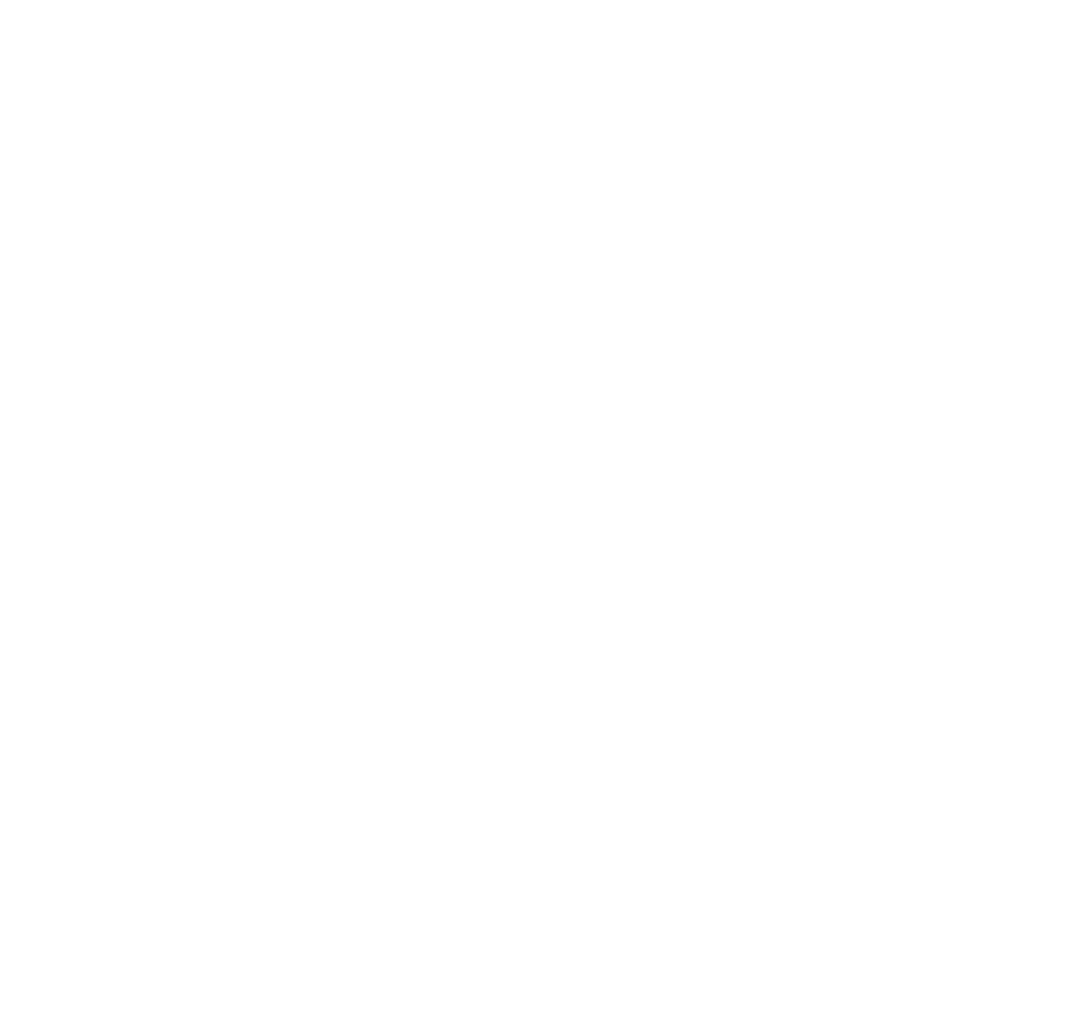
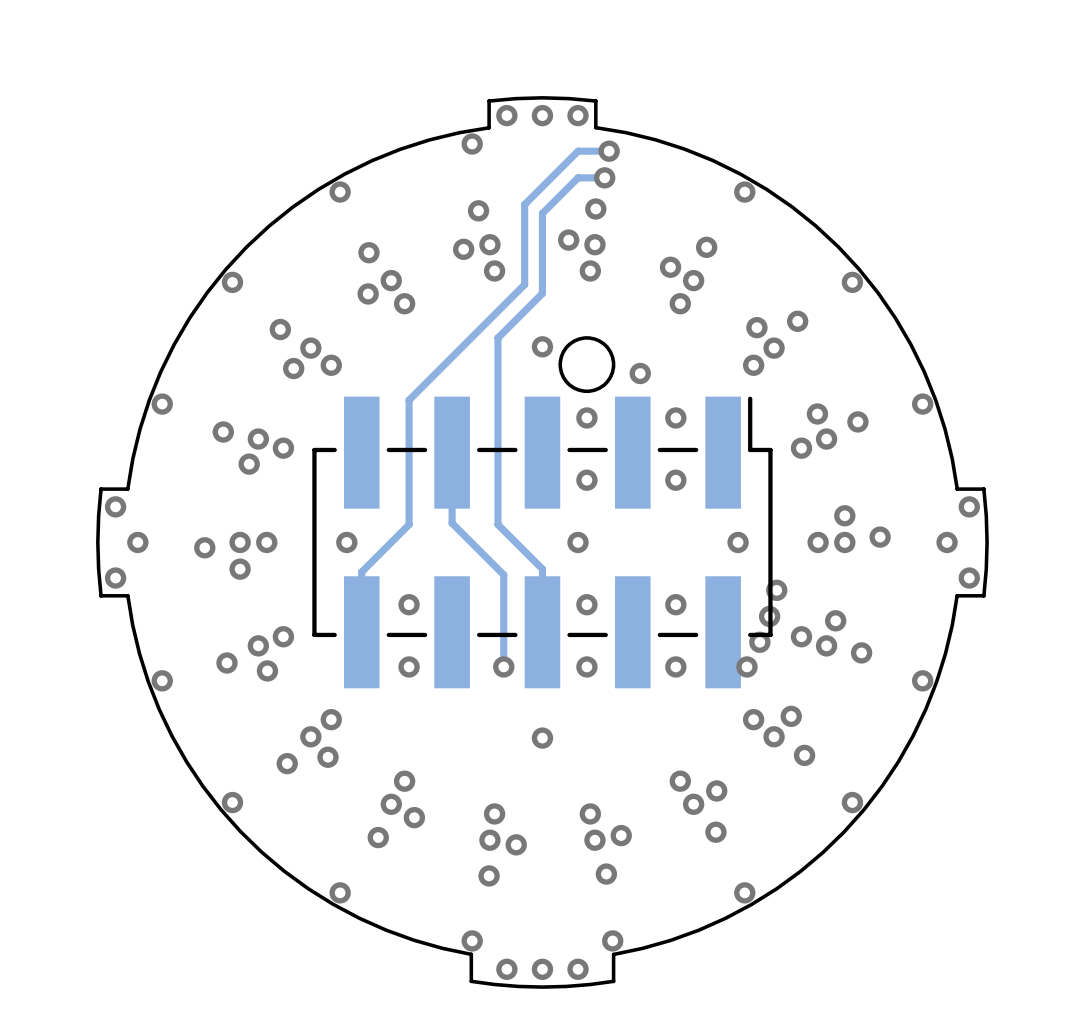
board edge: none -> (595, 101) (595, 127) (655, 139) (684, 149) (740, 174) (766, 189) (815, 225) (838, 246) (878, 292) (910, 344) (935, 400) (945, 429) (957, 489) (983, 489) (987, 542) (983, 595) (957, 595) (945, 653) (936, 681) (913, 735) (882, 786) (864, 809) (823, 852) (800, 871) (776, 888) (725, 918) (670, 940) (613, 954) (613, 981) (542, 987) (494, 984) (471, 981) (471, 954) (414, 940) (386, 930) (333, 904) (308, 888) (261, 852) (220, 809) (186, 761) (159, 709) (139, 653) (127, 595) (101, 595) (97, 542) (101, 489) (127, 489) (132, 458) (149, 400) (160, 371) (189, 318) (226, 269) (246, 246) (293, 206) (318, 189) (371, 160) (429, 139) (489, 127) (489, 101) (542, 97) (595, 101)
via: none -> (506, 115)
via: none -> (542, 115)
via: none -> (578, 115)
via: none -> (472, 143)
track: none -> (609, 151) (578, 151) (524, 204) (524, 284) (409, 400) (409, 524) (361, 571) (361, 632)
via: none -> (609, 151)
track: none -> (604, 177) (578, 177) (542, 213) (542, 293) (497, 337) (497, 524) (542, 569) (542, 632)
via: none -> (604, 177)
via: none -> (340, 192)
via: none -> (744, 192)
via: none -> (595, 208)
via: none -> (478, 210)
via: none -> (568, 240)
via: none -> (489, 244)
via: none -> (594, 244)
via: none -> (706, 247)
via: none -> (463, 249)
via: none -> (368, 252)
via: none -> (670, 267)
via: none -> (494, 270)
via: none -> (590, 270)
via: none -> (391, 280)
via: none -> (693, 280)
via: none -> (232, 282)
via: none -> (852, 282)
via: none -> (368, 293)
via: none -> (404, 303)
via: none -> (680, 303)
via: none -> (797, 321)
via: none -> (756, 327)
via: none -> (280, 329)
round board edge: none -> [558, 336, 616, 394]
via: none -> (542, 346)
via: none -> (310, 348)
via: none -> (774, 348)
via: none -> (331, 365)
via: none -> (753, 365)
via: none -> (293, 368)
via: none -> (640, 373)
via: none -> (162, 404)
via: none -> (922, 404)
via: none -> (817, 413)
via: none -> (586, 417)
via: none -> (675, 417)
via: none -> (857, 421)
via: none -> (223, 432)
via: none -> (258, 439)
via: none -> (826, 439)
via: none -> (283, 448)
via: none -> (801, 448)
track: none -> (452, 452) (452, 523) (503, 574) (503, 666)
via: none -> (249, 464)
via: none -> (586, 480)
via: none -> (675, 480)
via: none -> (115, 506)
via: none -> (969, 506)
via: none -> (844, 515)
via: none -> (880, 537)
via: none -> (137, 542)
via: none -> (240, 542)
via: none -> (266, 542)
via: none -> (346, 542)
part: none -> (542, 542)
via: none -> (578, 542)
via: none -> (738, 542)
via: none -> (818, 542)
via: none -> (844, 542)
via: none -> (947, 542)
via: none -> (204, 547)
via: none -> (240, 569)
via: none -> (115, 578)
via: none -> (969, 578)
via: none -> (776, 590)
via: none -> (409, 604)
via: none -> (586, 604)
via: none -> (675, 604)
via: none -> (769, 616)
via: none -> (835, 620)
via: none -> (283, 636)
via: none -> (801, 636)
via: none -> (759, 642)
via: none -> (258, 645)
via: none -> (826, 645)
via: none -> (861, 652)
via: none -> (226, 662)
via: none -> (409, 666)
via: none -> (503, 666)
via: none -> (586, 666)
via: none -> (675, 666)
via: none -> (746, 666)
via: none -> (267, 670)
via: none -> (162, 680)
via: none -> (922, 680)
via: none -> (791, 716)
via: none -> (331, 719)
via: none -> (753, 719)
via: none -> (310, 736)
via: none -> (774, 736)
via: none -> (542, 738)
via: none -> (804, 755)
via: none -> (327, 757)
via: none -> (287, 763)
via: none -> (404, 781)
via: none -> (680, 781)
via: none -> (716, 790)
via: none -> (232, 802)
via: none -> (852, 802)
via: none -> (391, 804)
via: none -> (693, 804)
via: none -> (494, 813)
via: none -> (590, 813)
via: none -> (414, 817)
via: none -> (715, 832)
via: none -> (621, 835)
via: none -> (378, 837)
via: none -> (489, 840)
via: none -> (594, 840)
via: none -> (516, 844)
via: none -> (606, 874)
via: none -> (489, 875)
via: none -> (340, 892)
via: none -> (744, 892)
via: none -> (472, 940)
via: none -> (612, 940)
via: none -> (506, 969)
via: none -> (542, 969)
via: none -> (578, 969)

